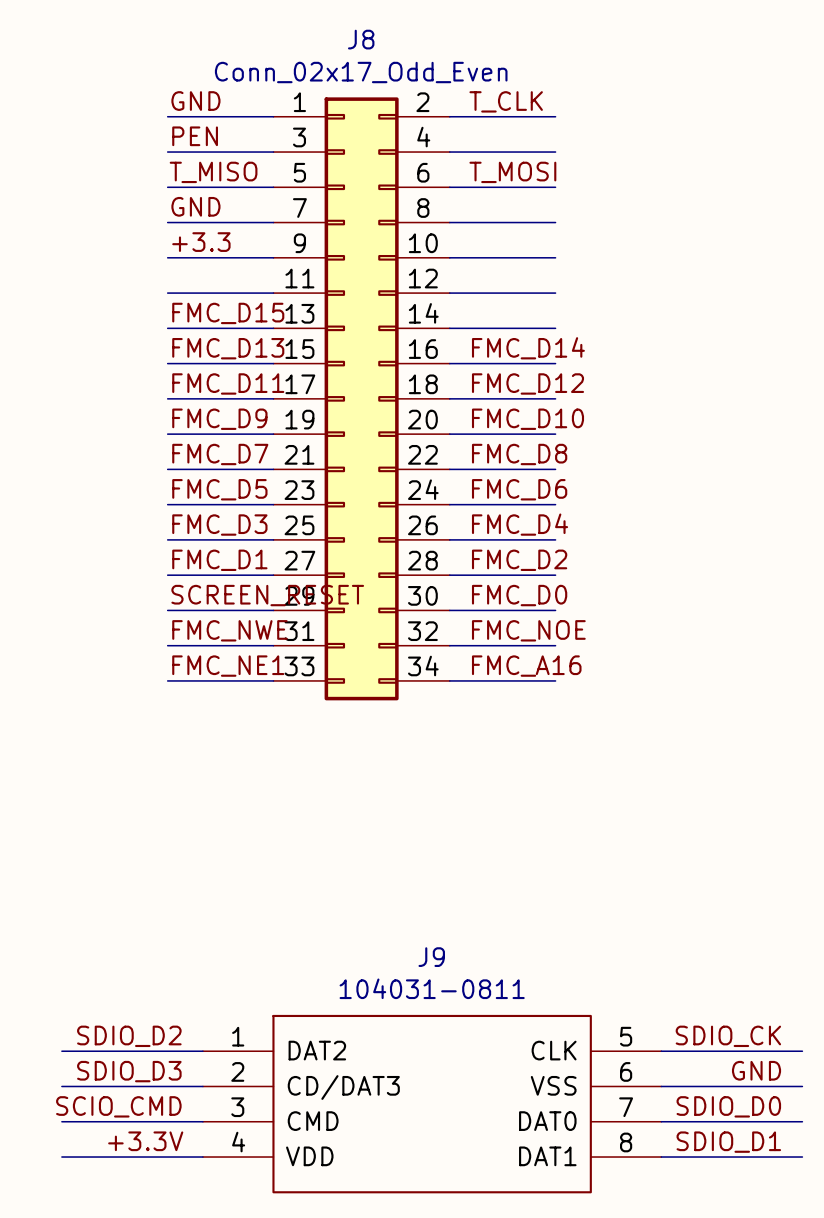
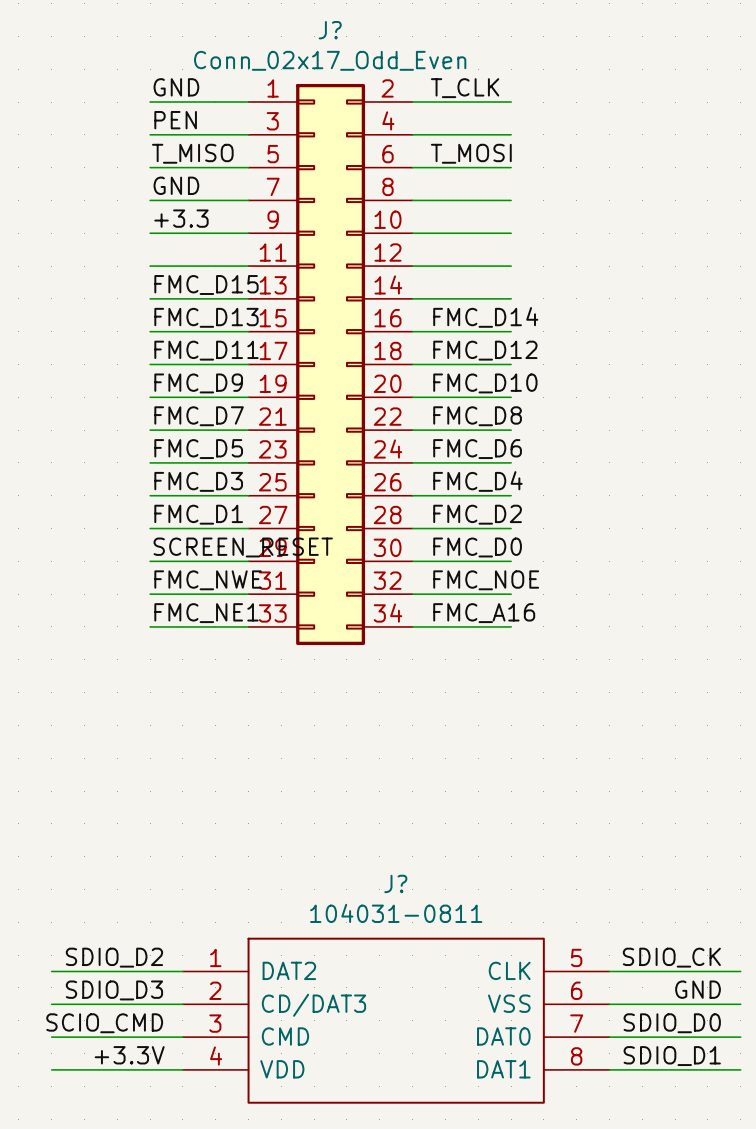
J8 name: J8 (361, 39) -> J? (330, 30)
J9 name: J9 (431, 957) -> J? (395, 883)

